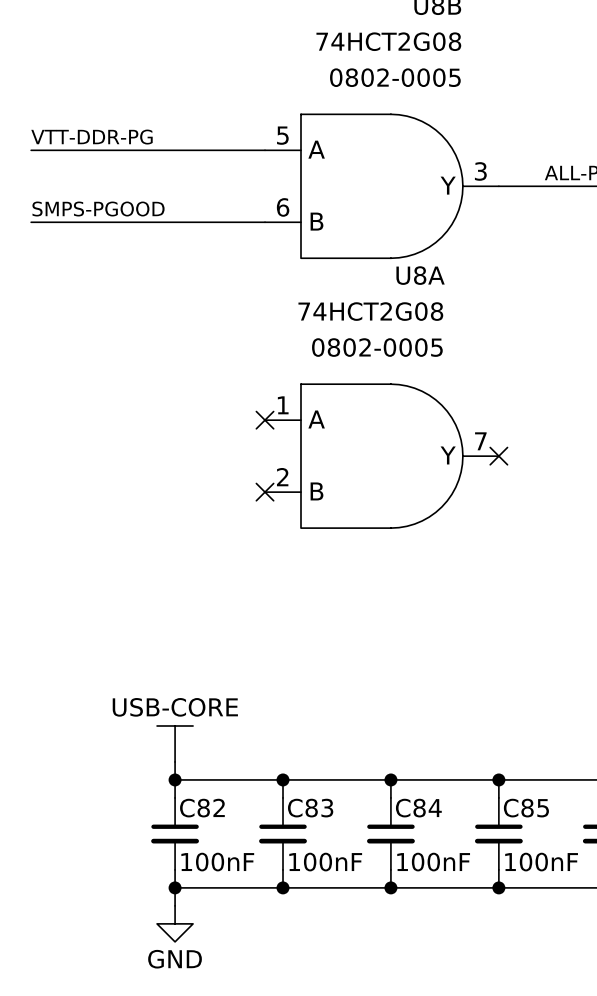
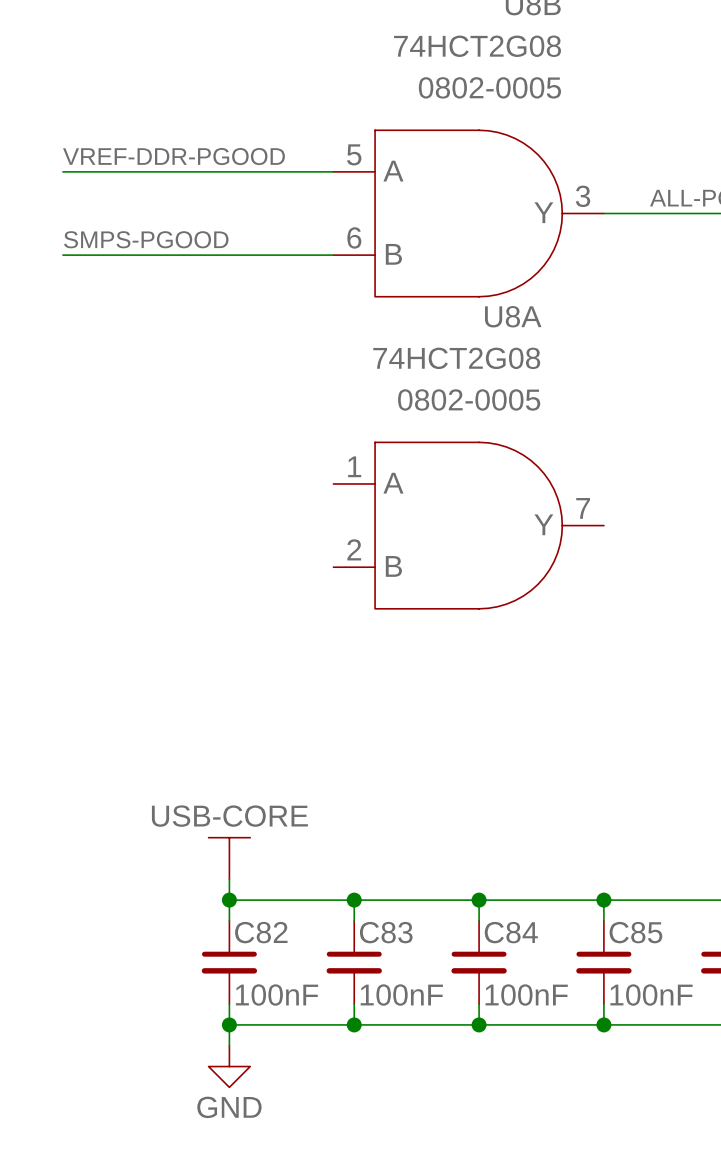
label: VTT-DDR-PG (92, 137) -> VREF-DDR-PGOOD (173, 156)
no-connect mark: (265, 420) -> none
no-connect mark: (498, 456) -> none
no-connect mark: (265, 492) -> none

